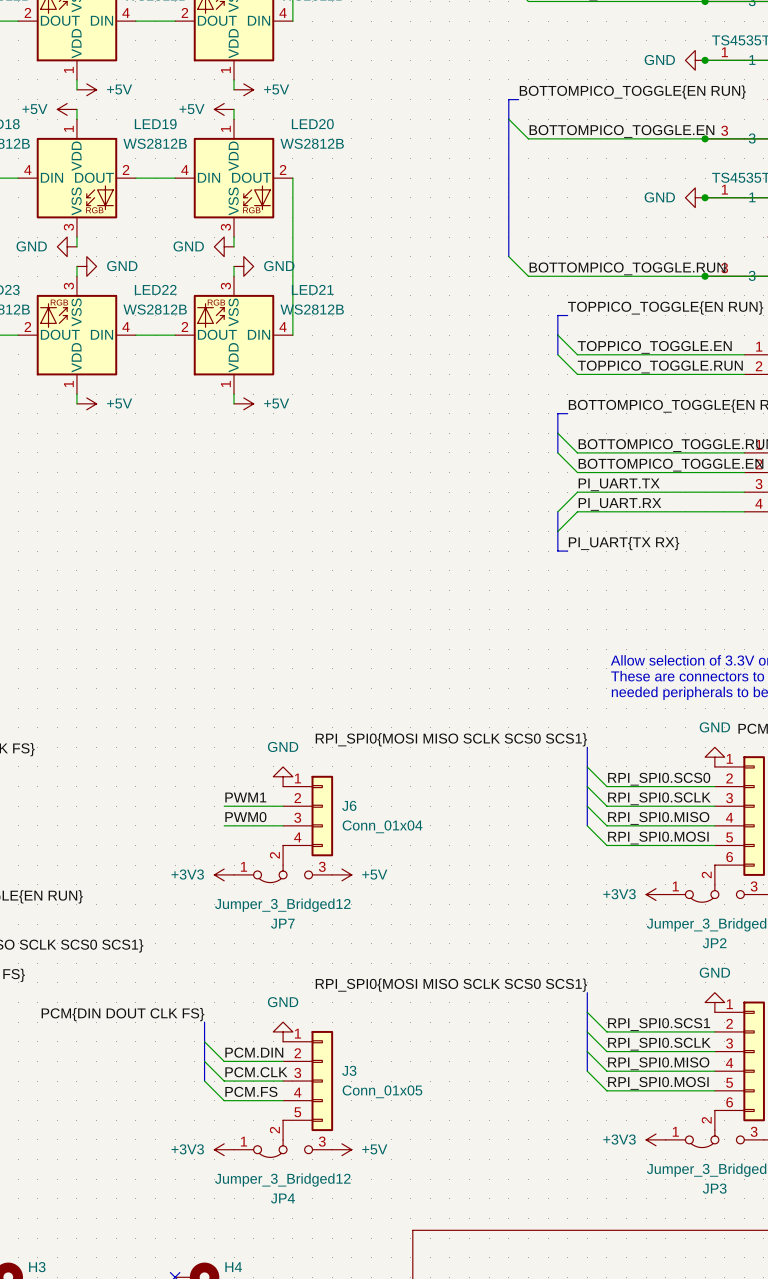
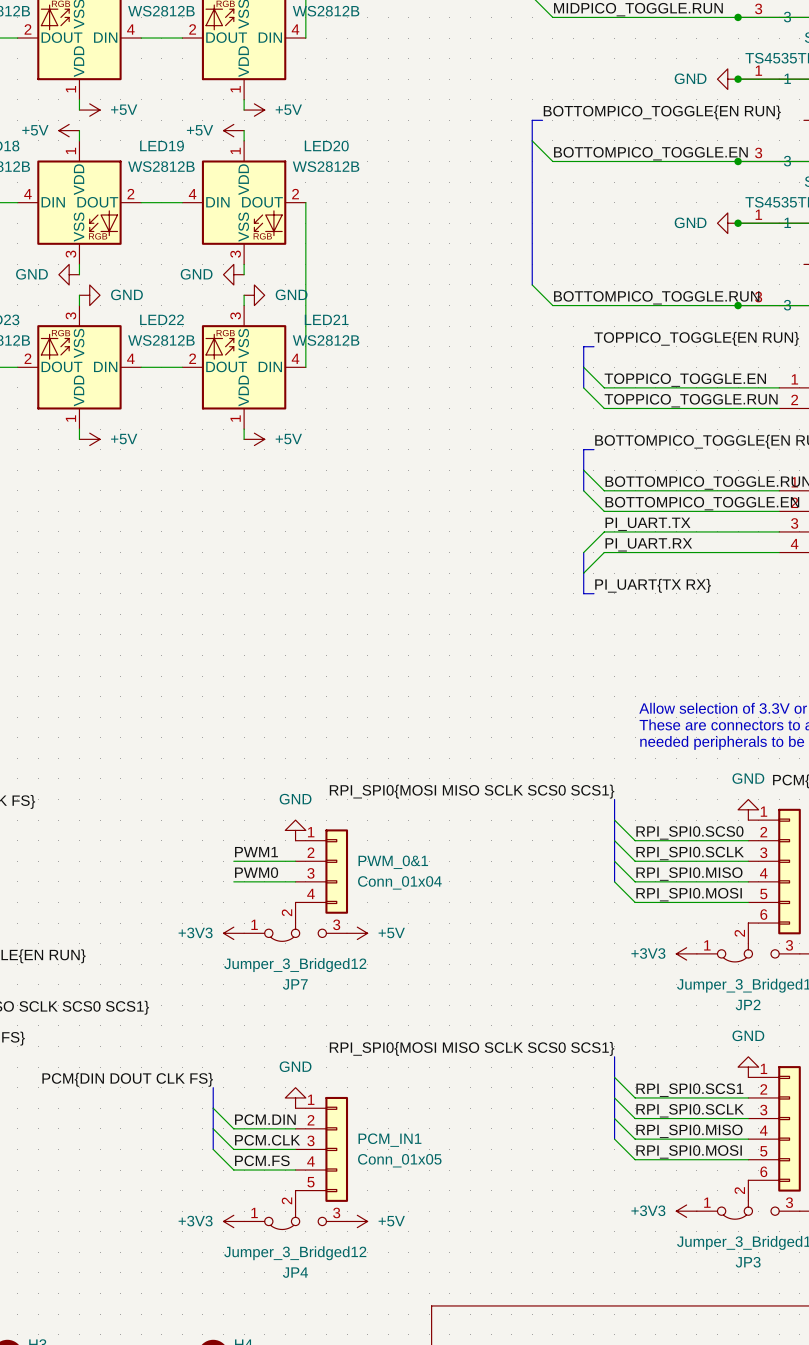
J6 name: J6 (349, 805) -> PWM_0&1 (393, 862)
J3 name: J3 (349, 1070) -> PCM_IN1 (389, 1140)

